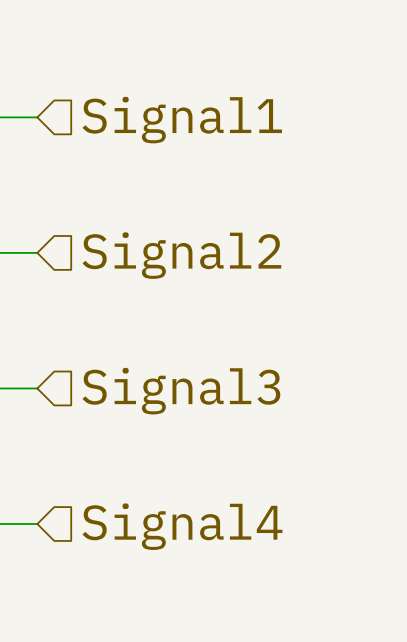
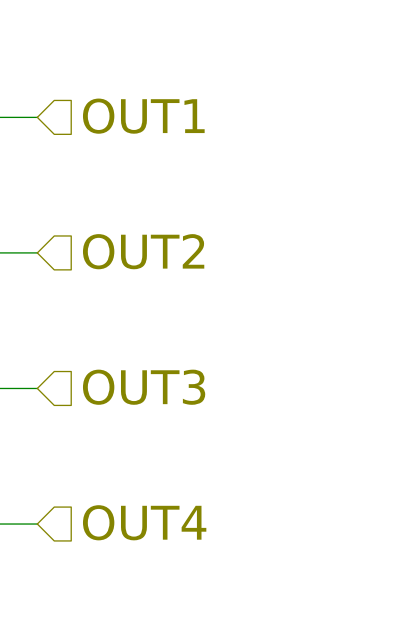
hierarchical label: Signal1 (182, 120) -> OUT1 (143, 116)
hierarchical label: Signal2 (181, 255) -> OUT2 (143, 251)
hierarchical label: Signal3 (181, 391) -> OUT3 (144, 387)
hierarchical label: Signal4 (182, 526) -> OUT4 (144, 522)

